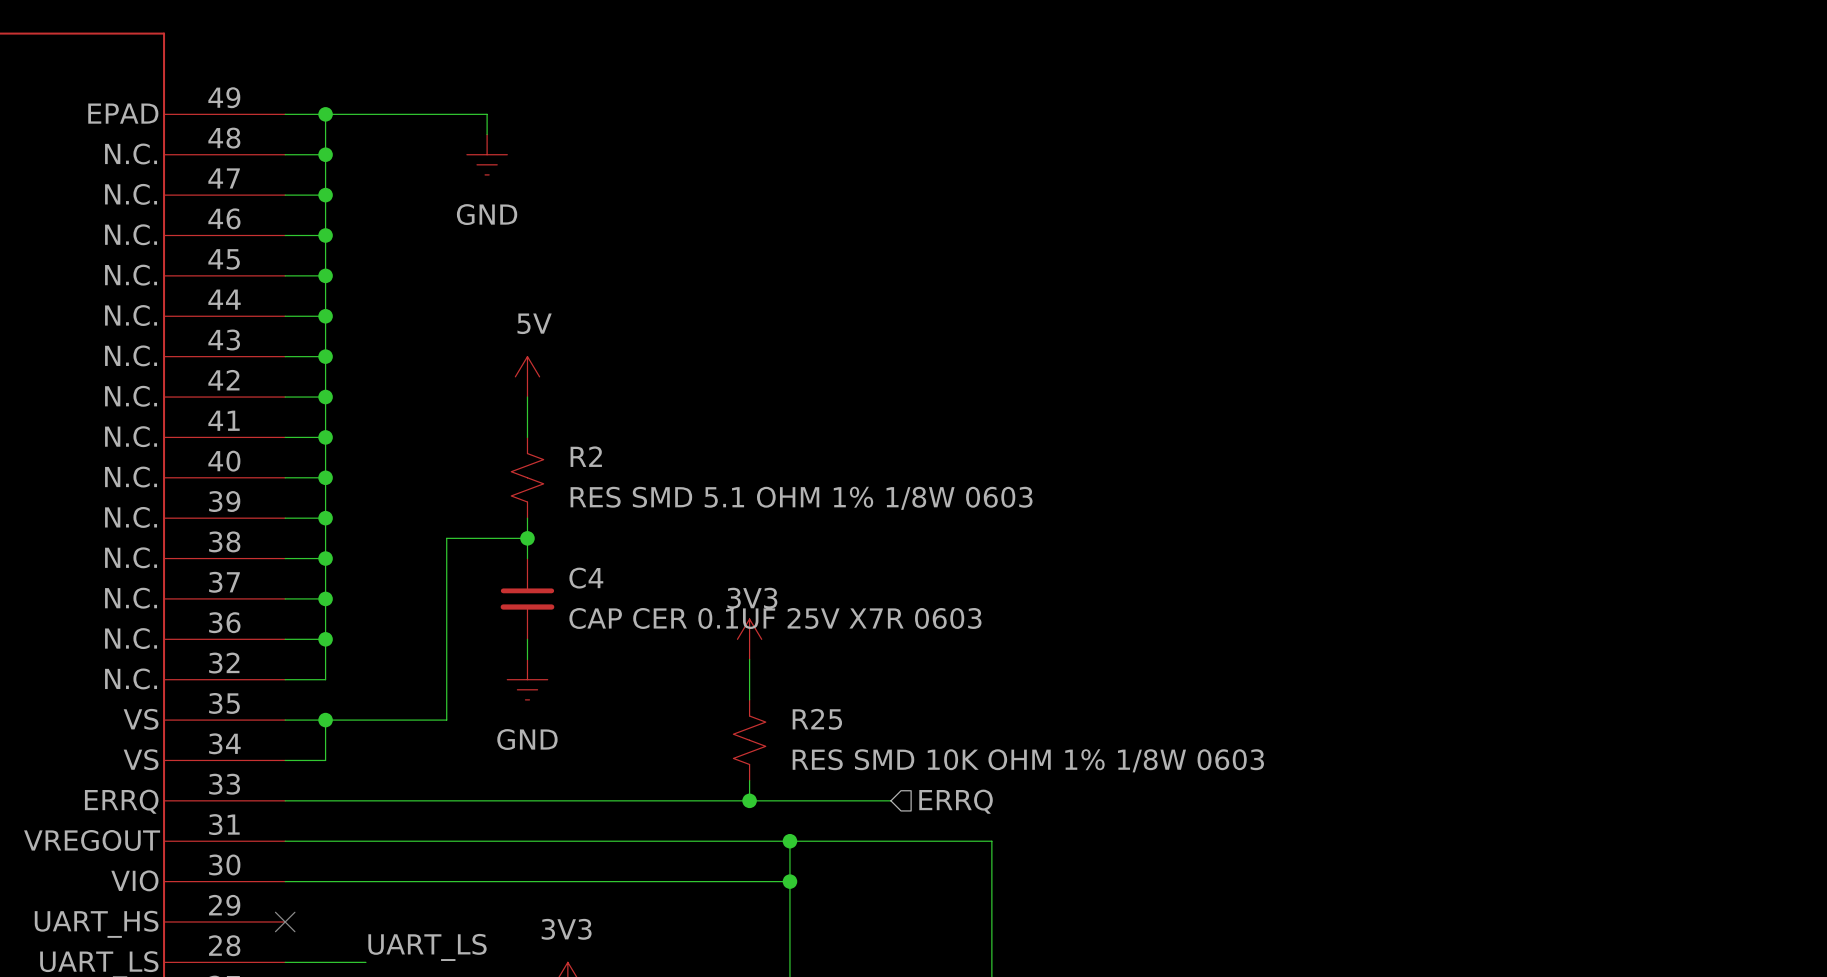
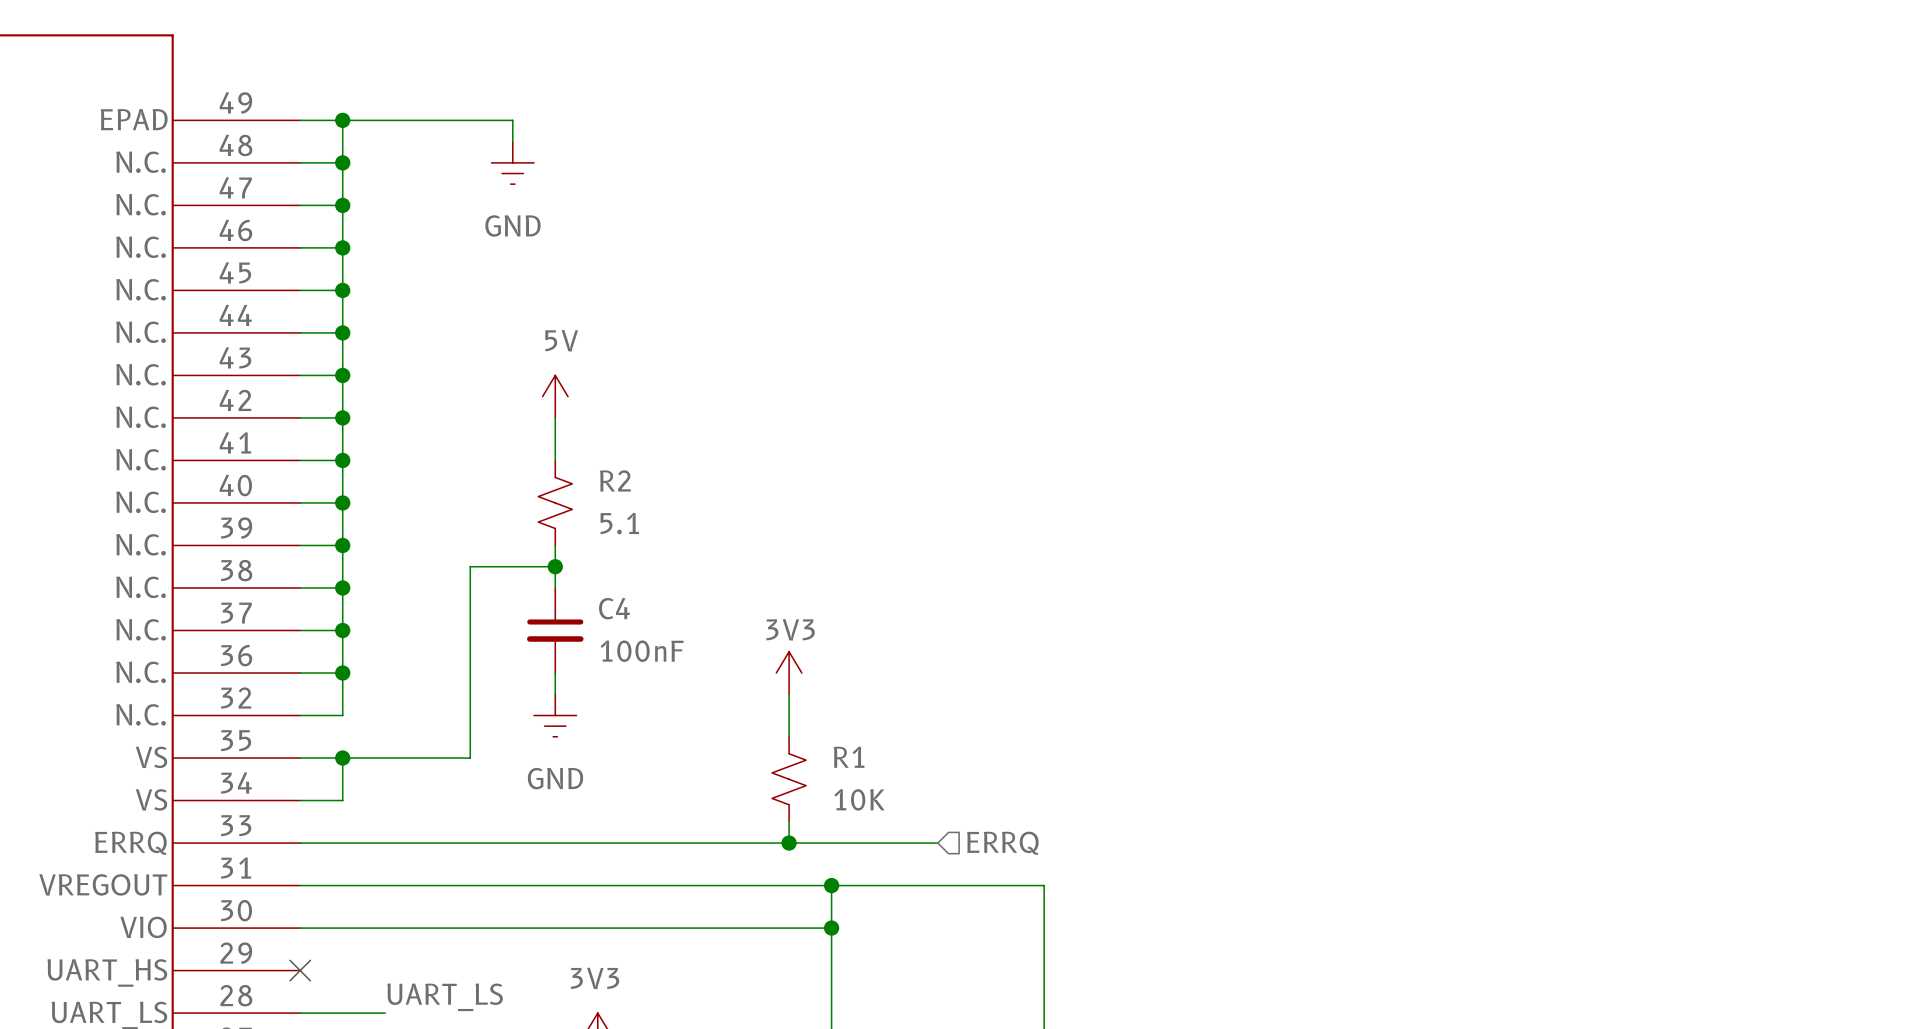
R2 value: RES SMD 5.1 OHM 1% 1/8W 0603 (801, 498) -> 5.1 (619, 523)
C4 value: CAP CER 0.1UF 25V X7R 0603 (775, 618) -> 100nF (642, 651)
R25 name: R25 (817, 719) -> R1 (849, 757)
R25 value: RES SMD 10K OHM 1% 1/8W 0603 (1028, 760) -> 10K (859, 799)

